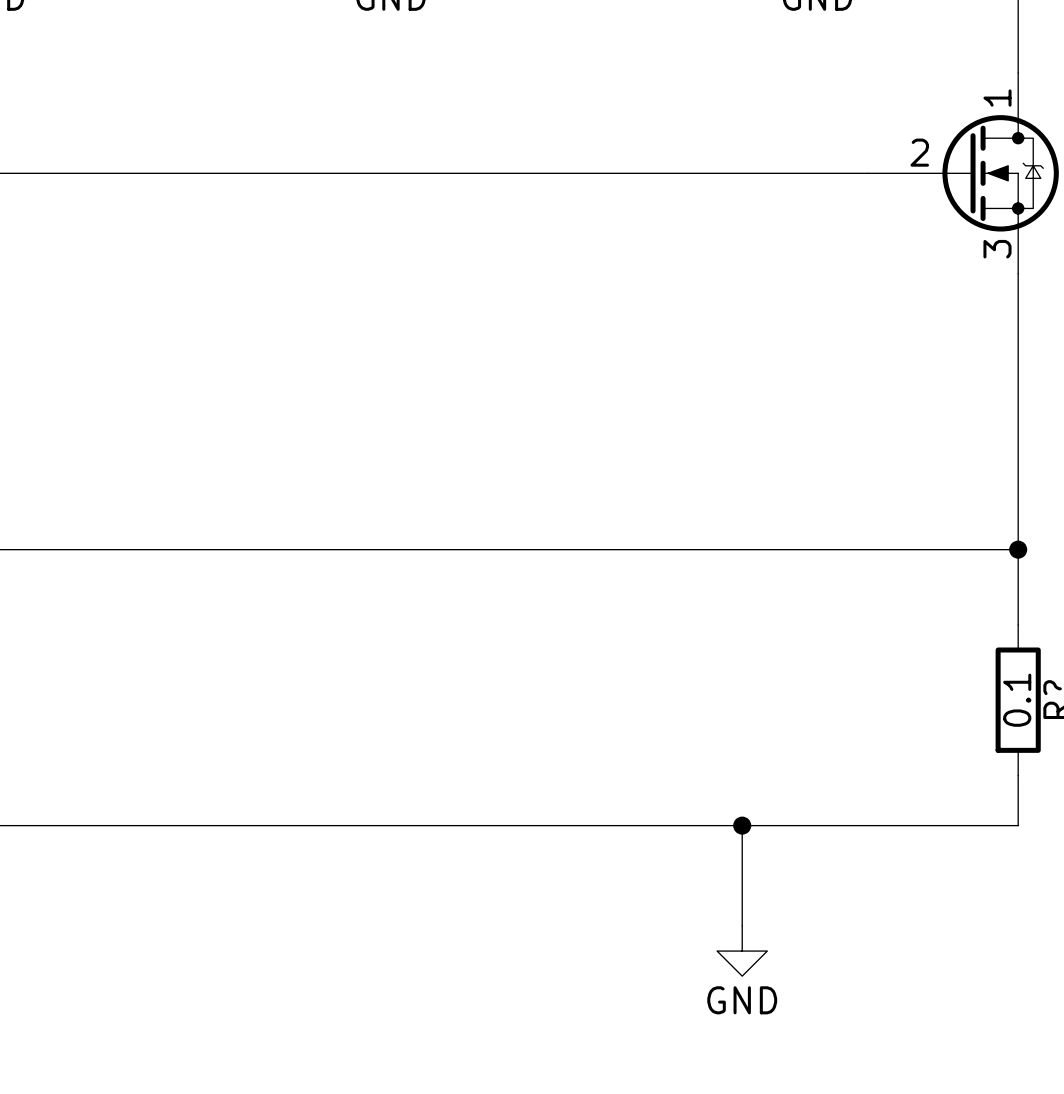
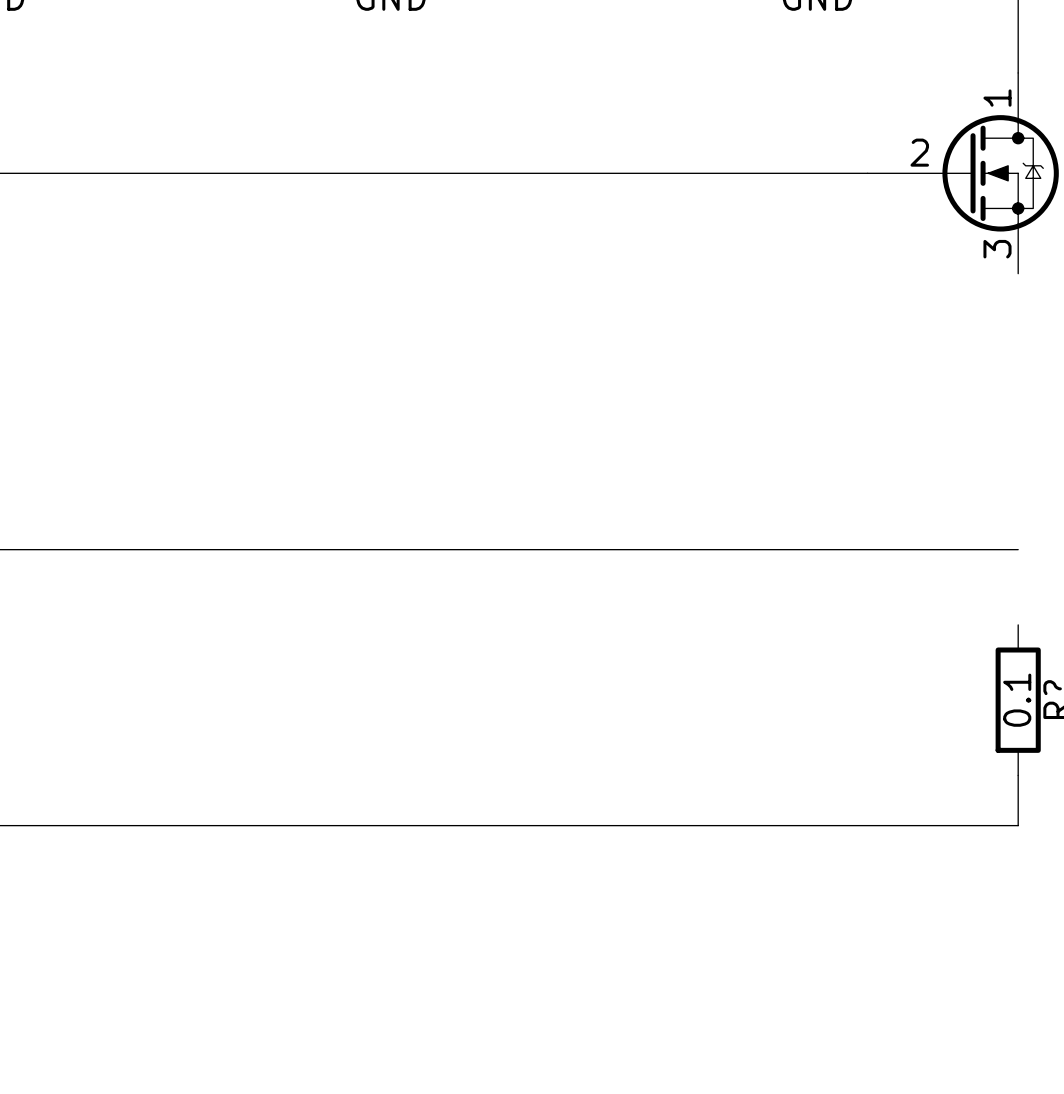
wire: (1018, 273) (1018, 624) -> none
junction: (1018, 549) -> none
wire: (742, 825) (742, 925) -> none
junction: (742, 825) -> none
power symbol: GND (742, 951) -> none

